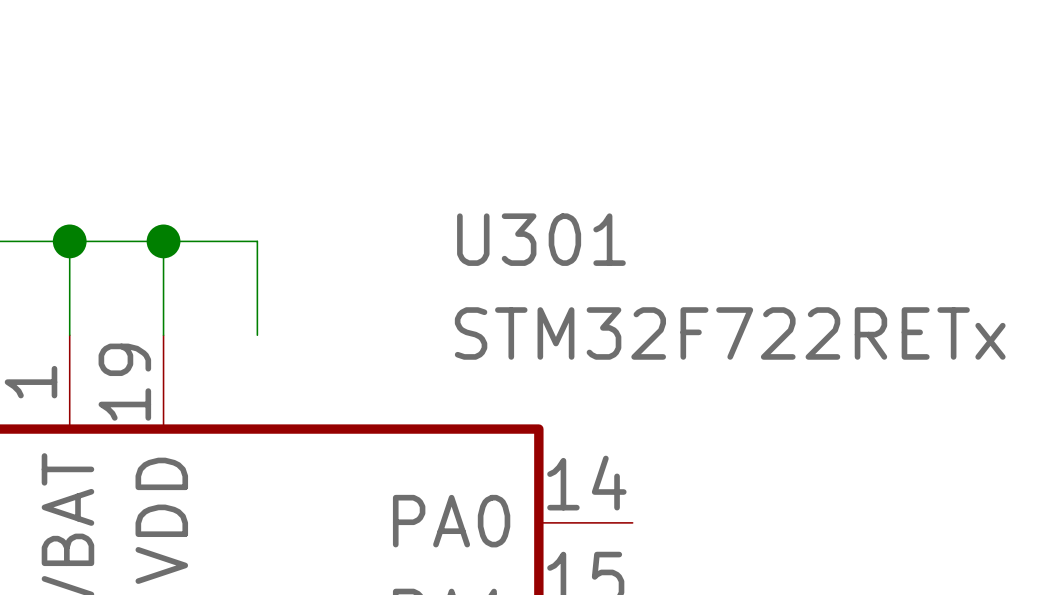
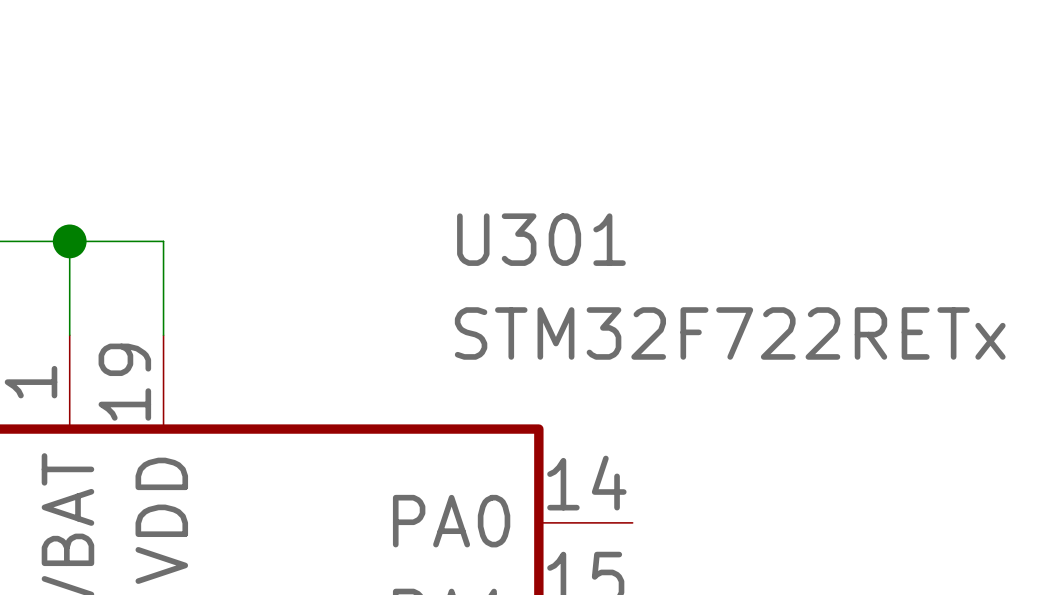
wire: (163, 241) (257, 241) (257, 335) -> none
junction: (163, 241) -> none

